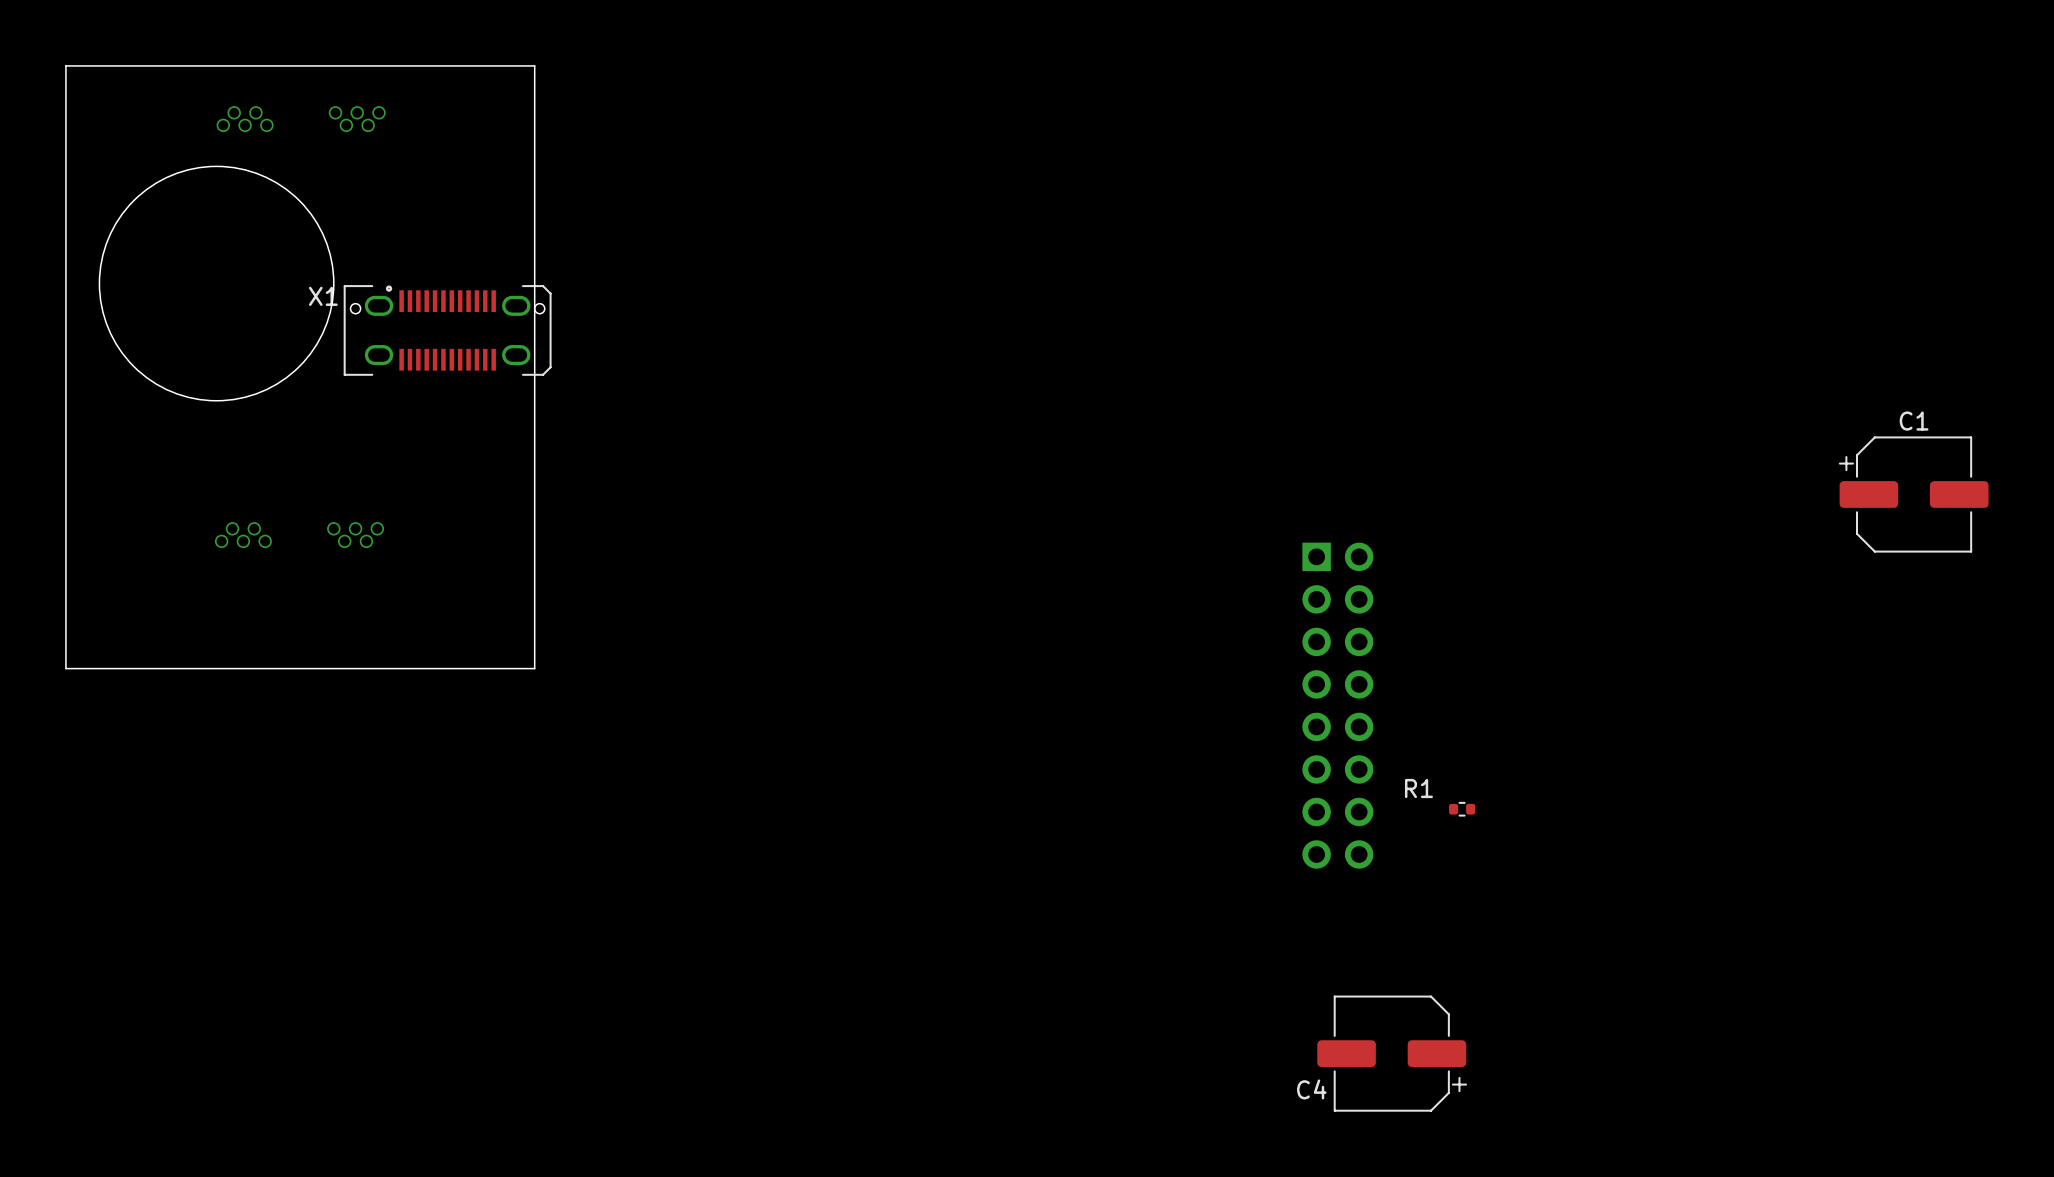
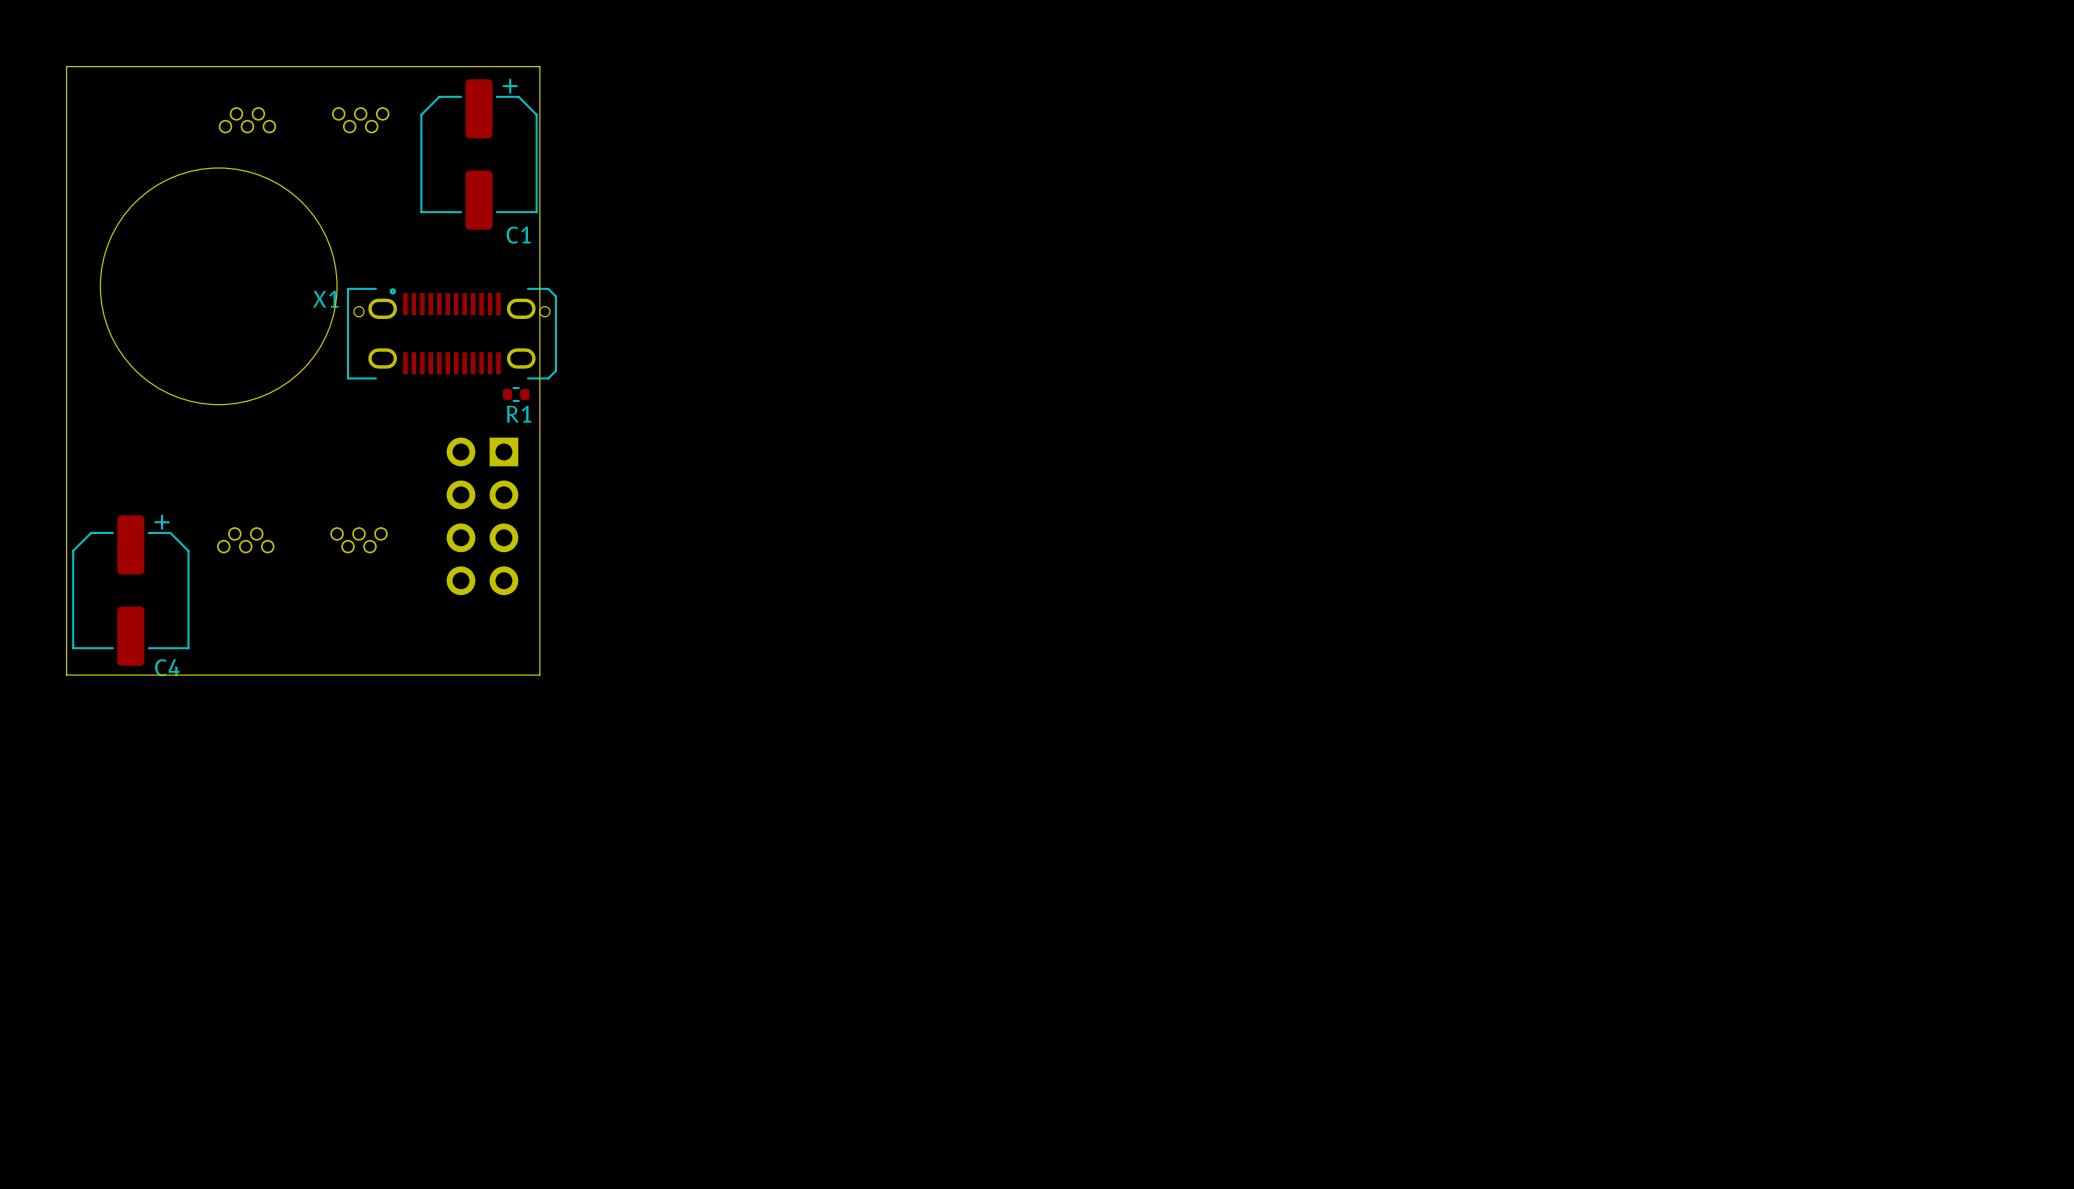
C1 name position: C1 (1914, 421) -> C1 (518, 235)
C1 rotation: 0° (1913, 494) -> 90° clockwise (479, 154)
C1 position: (1913, 494) -> (479, 154)
part: none -> (482, 516)
part: (1337, 705) -> none
R1 name position: R1 (1418, 788) -> R1 (519, 414)
R1 position: (1462, 809) -> (516, 394)
C4 rotation: 0° (1392, 1053) -> 90° counterclockwise (130, 590)
C4 position: (1392, 1053) -> (130, 590)

